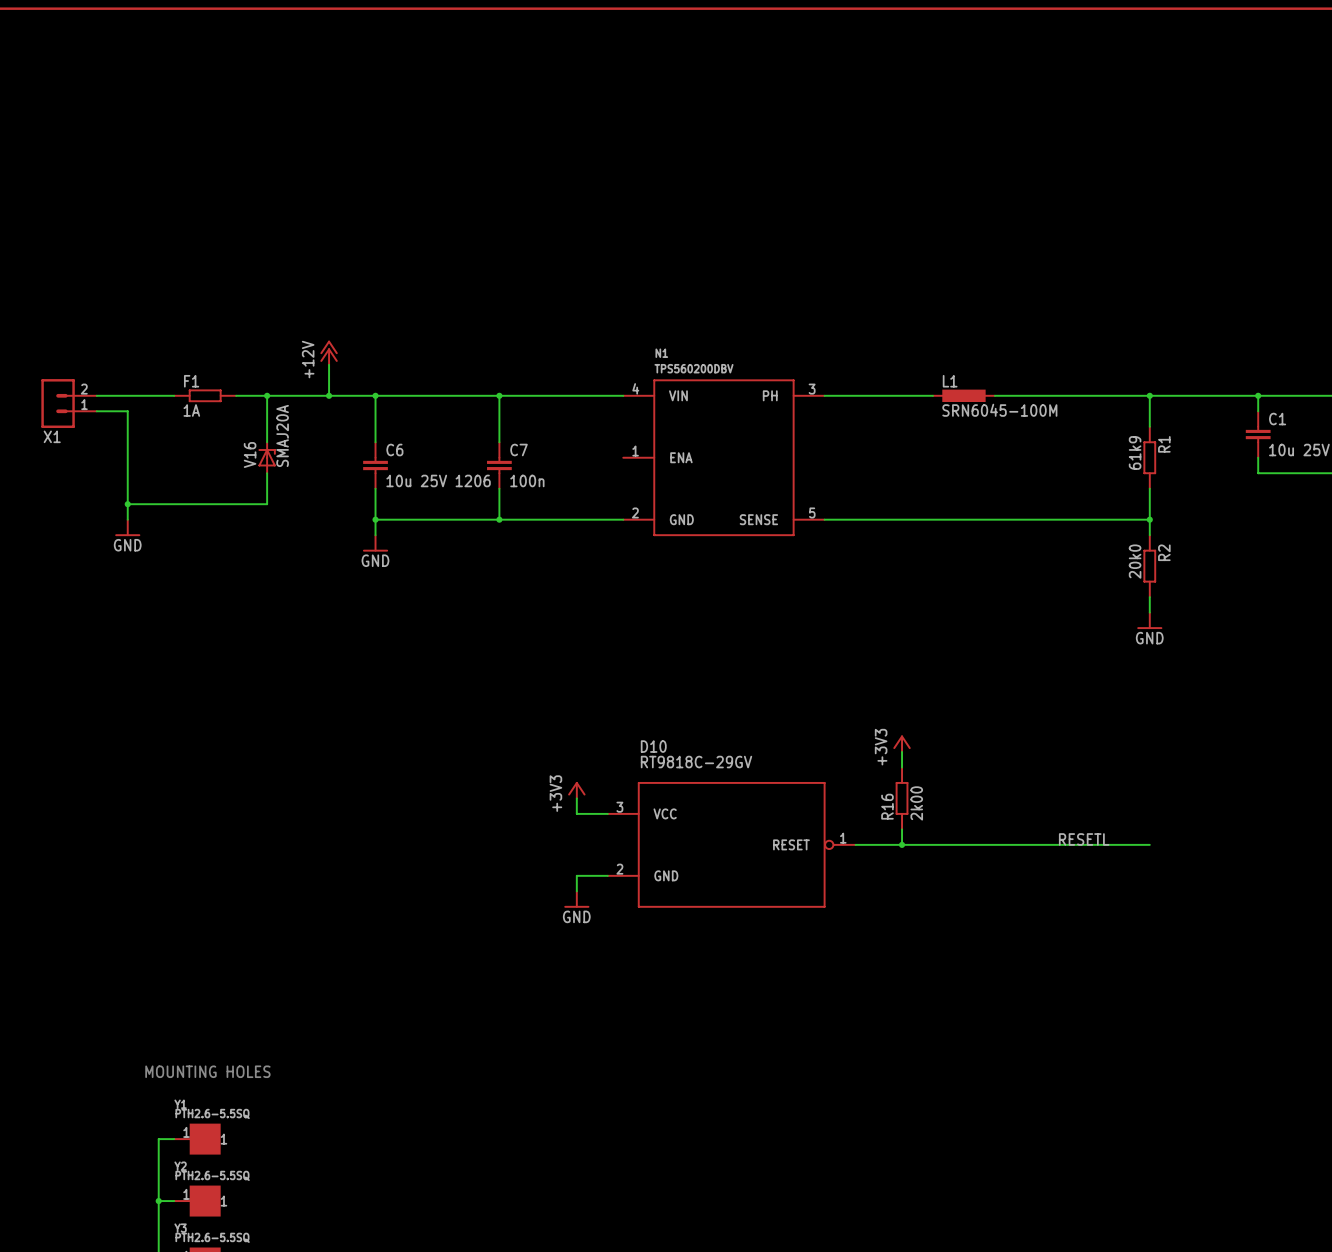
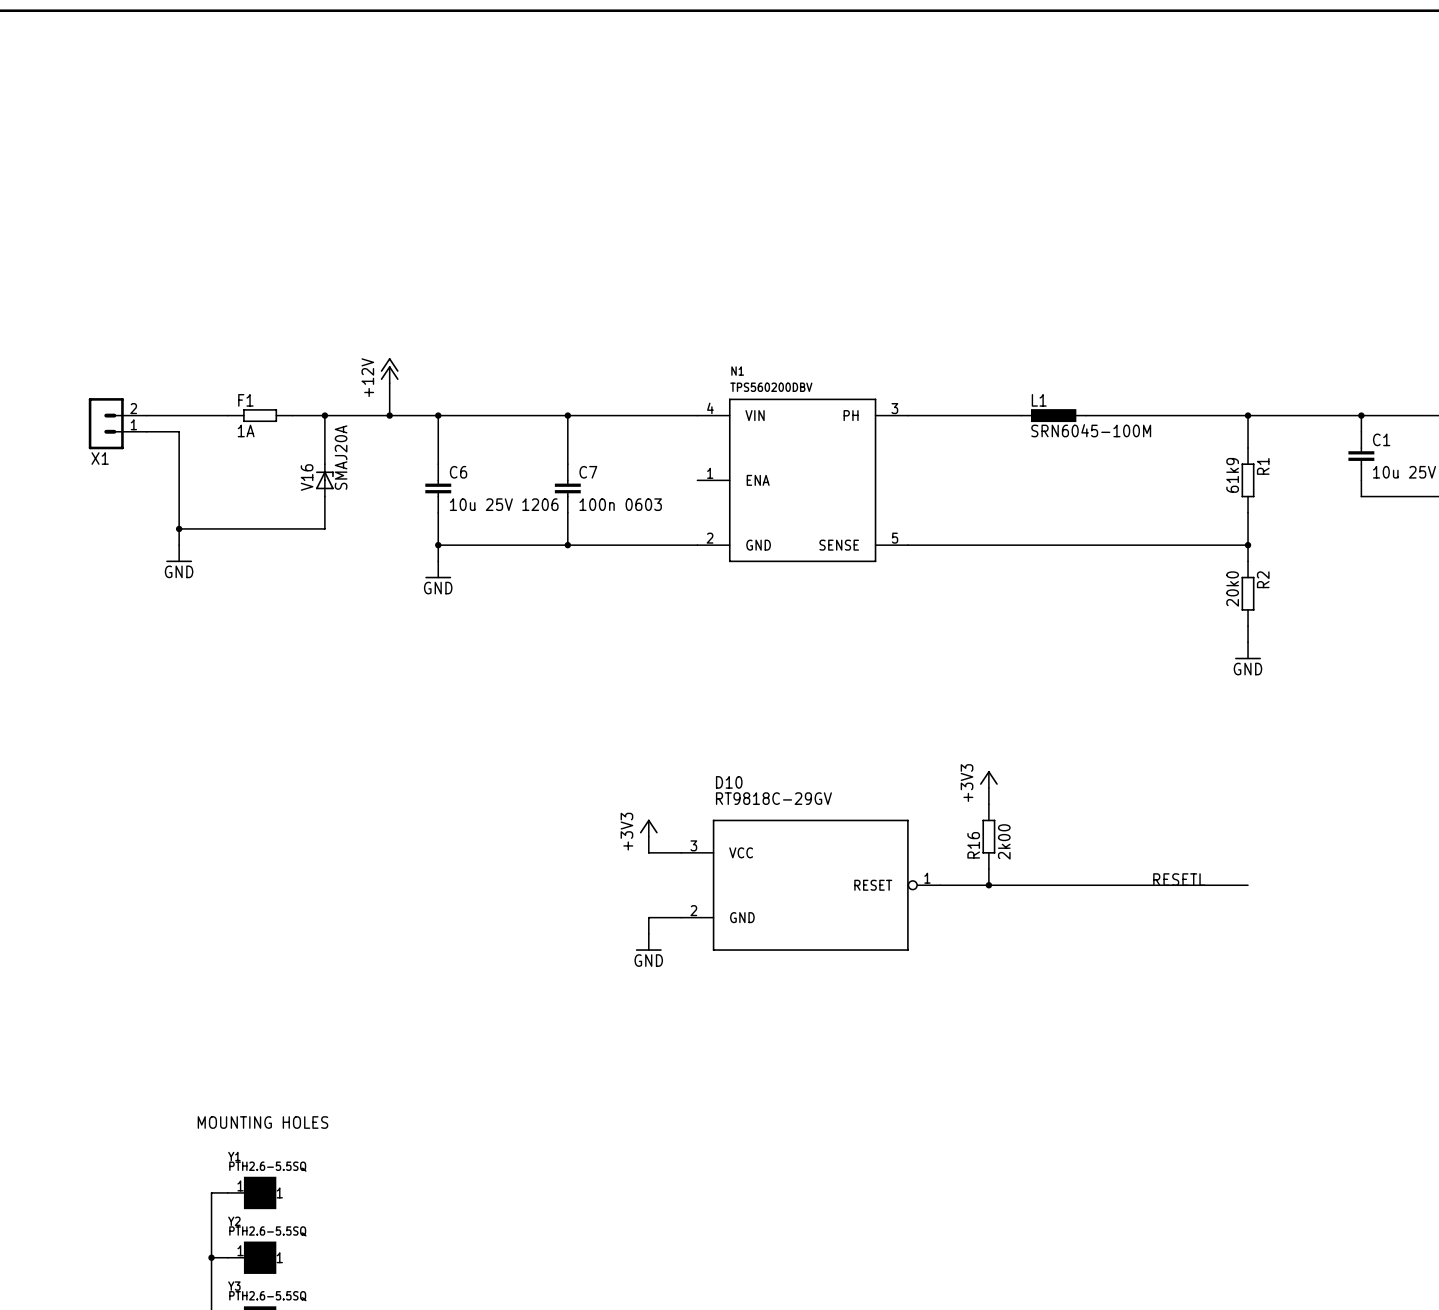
C7 value: 100n (527, 480) -> 100n 0603 (620, 504)

